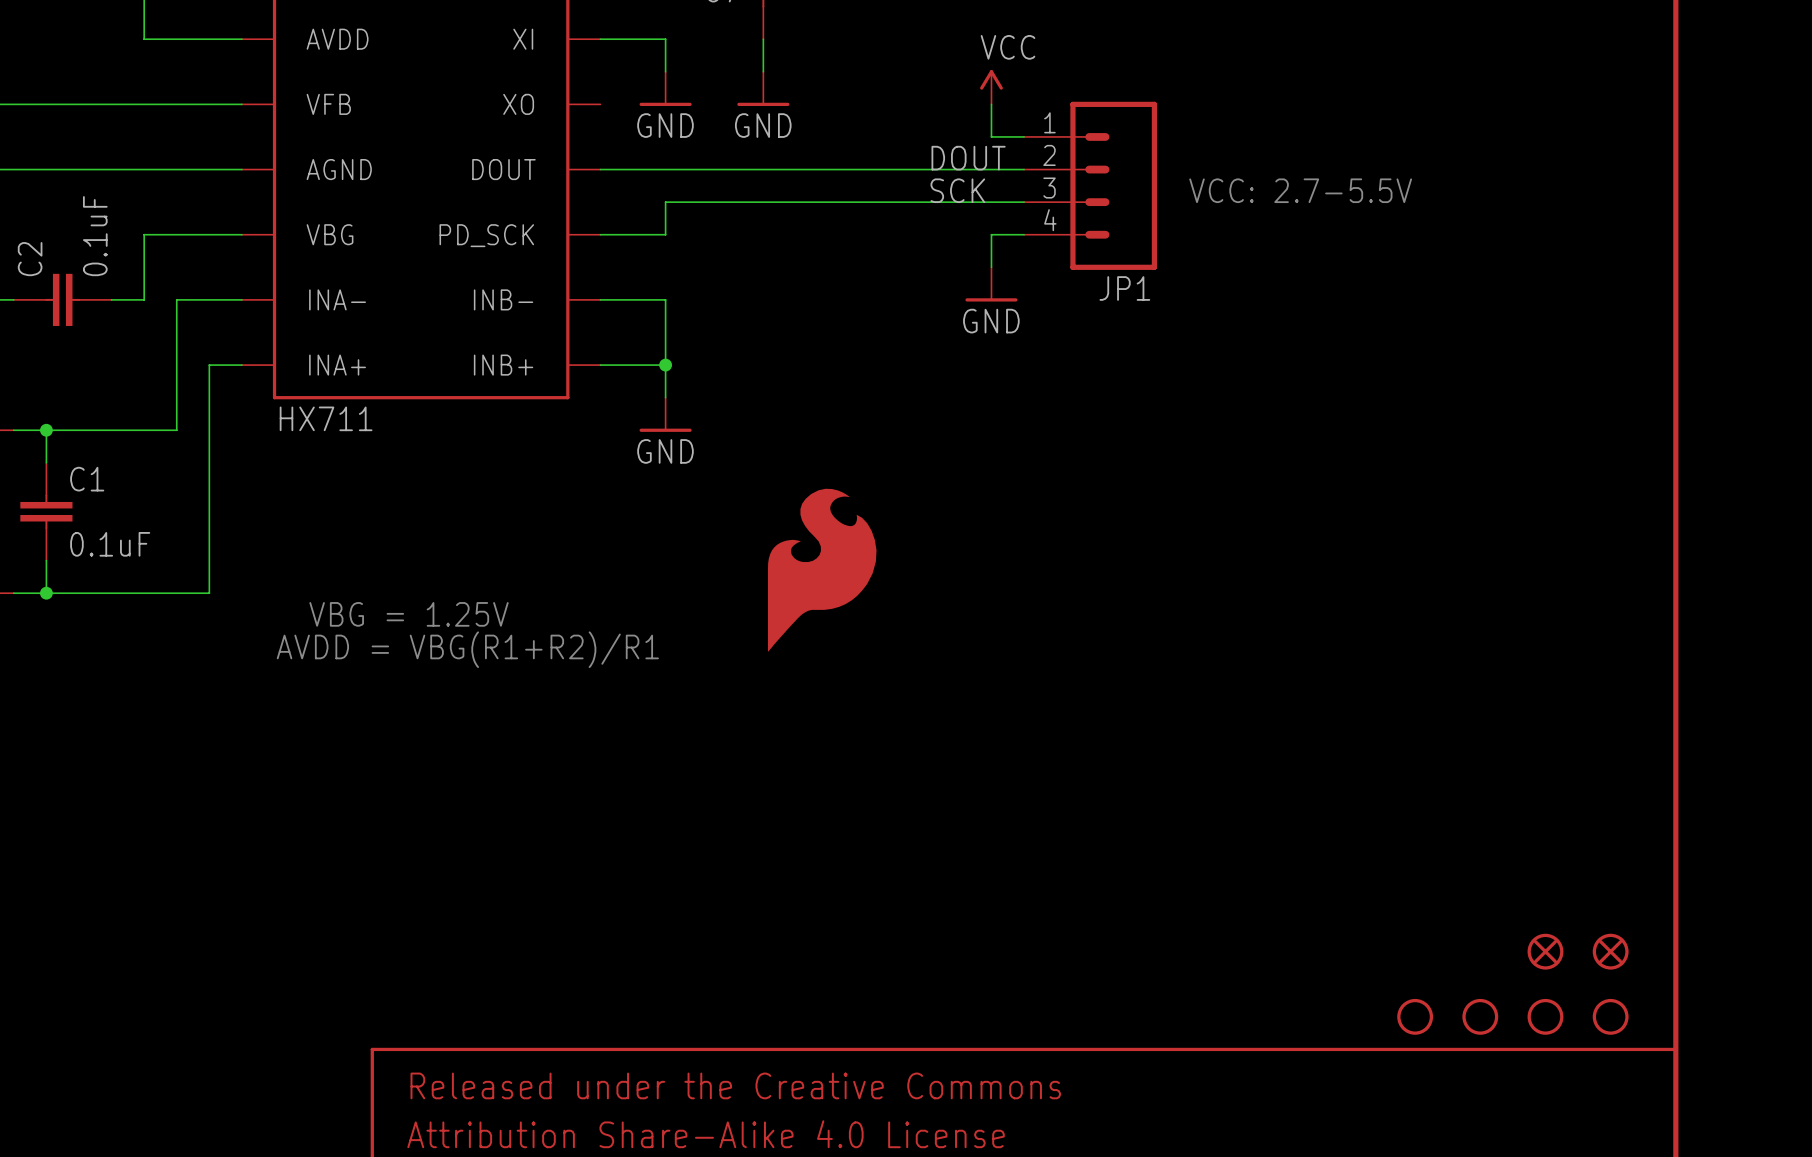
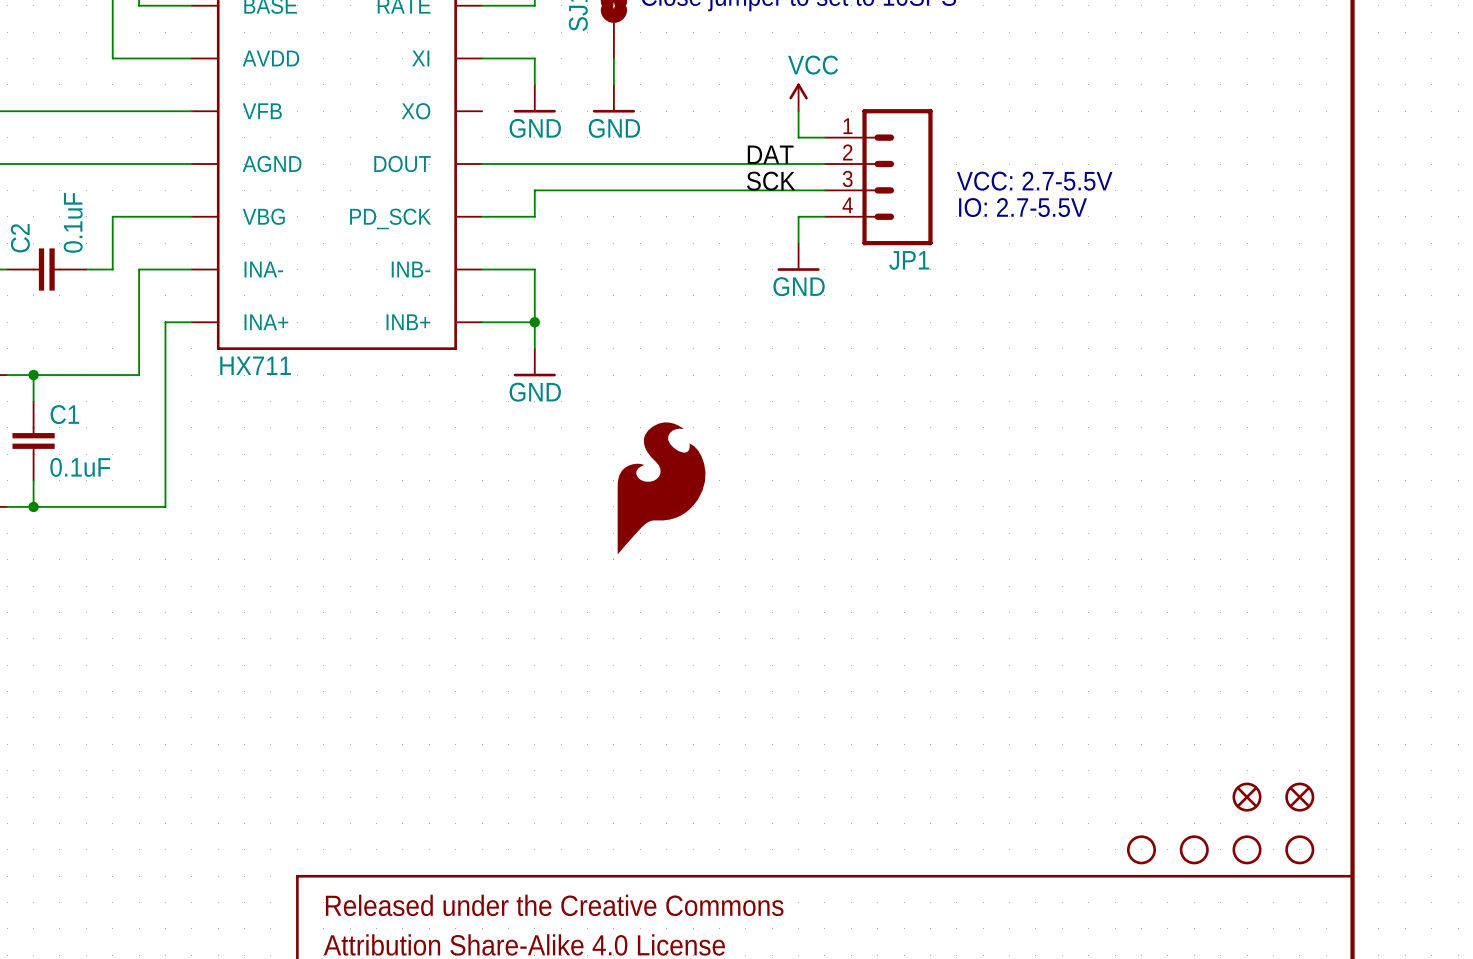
label: DOUT (968, 158) -> DAT (770, 154)
text: none -> IO: 2.7-5.5V (1023, 207)
text: VBG = 1.25V (409, 614) -> none
text: AVDD = VBG(R1+R2)/R1 (467, 649) -> none

